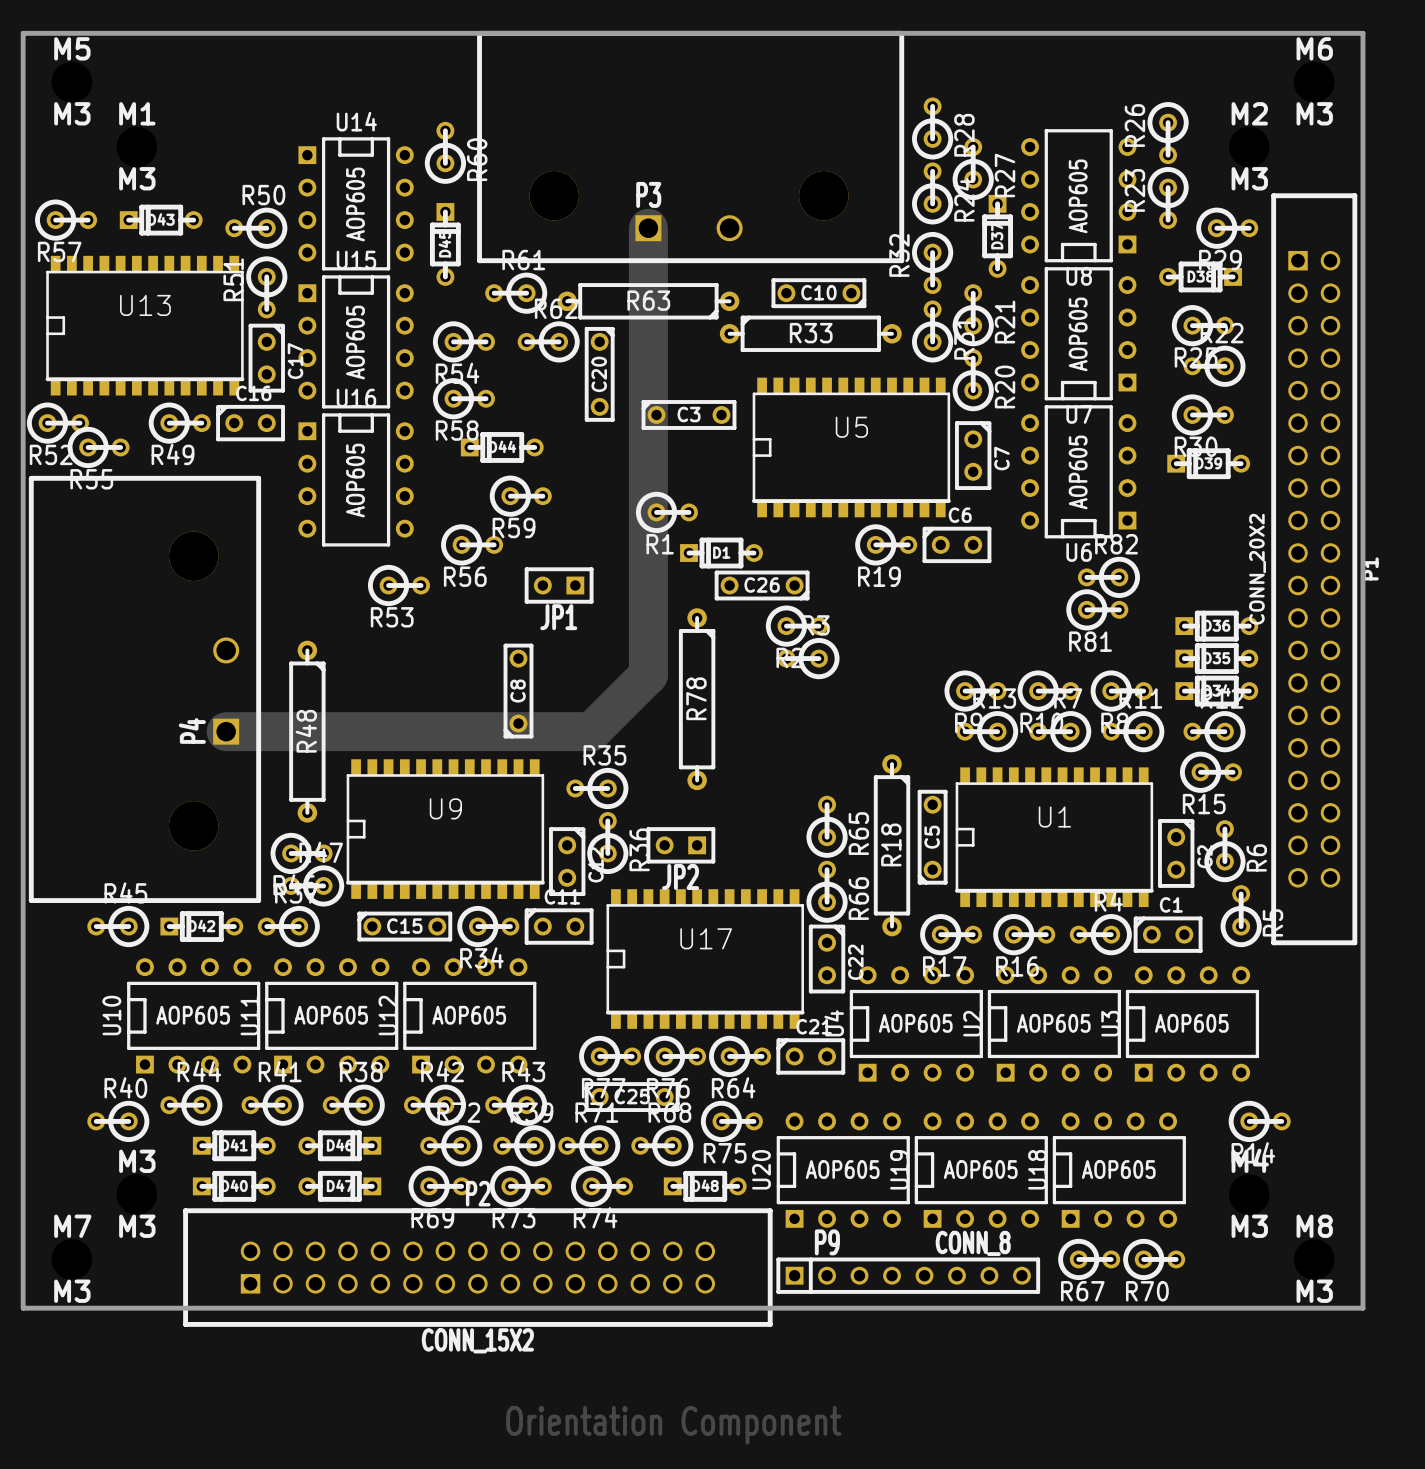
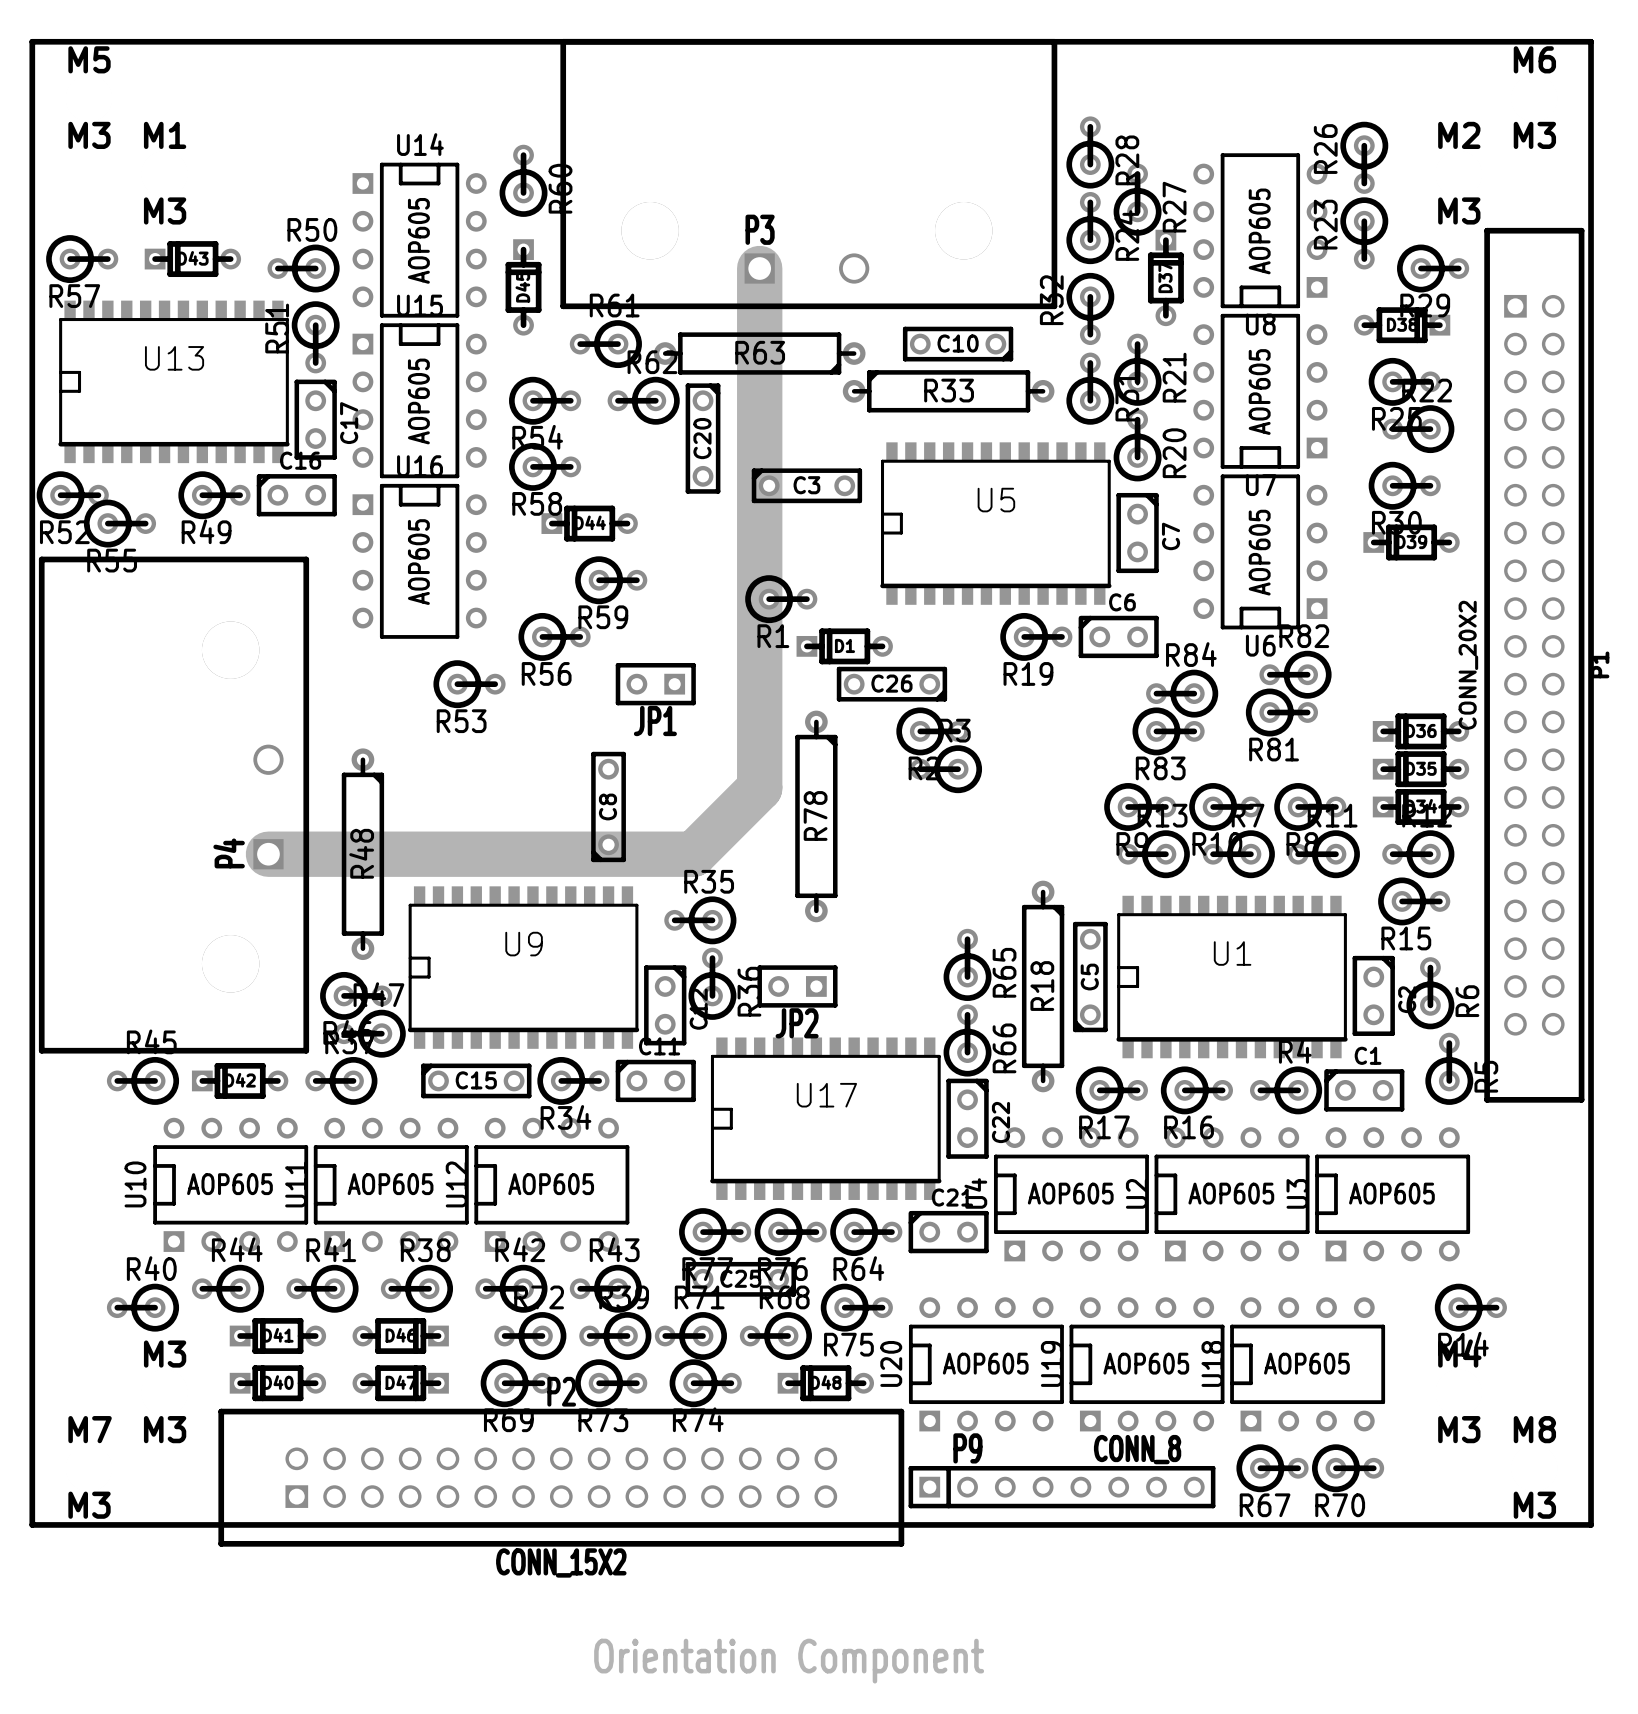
R84: none -> (1182, 693)
R83: none -> (1168, 731)

